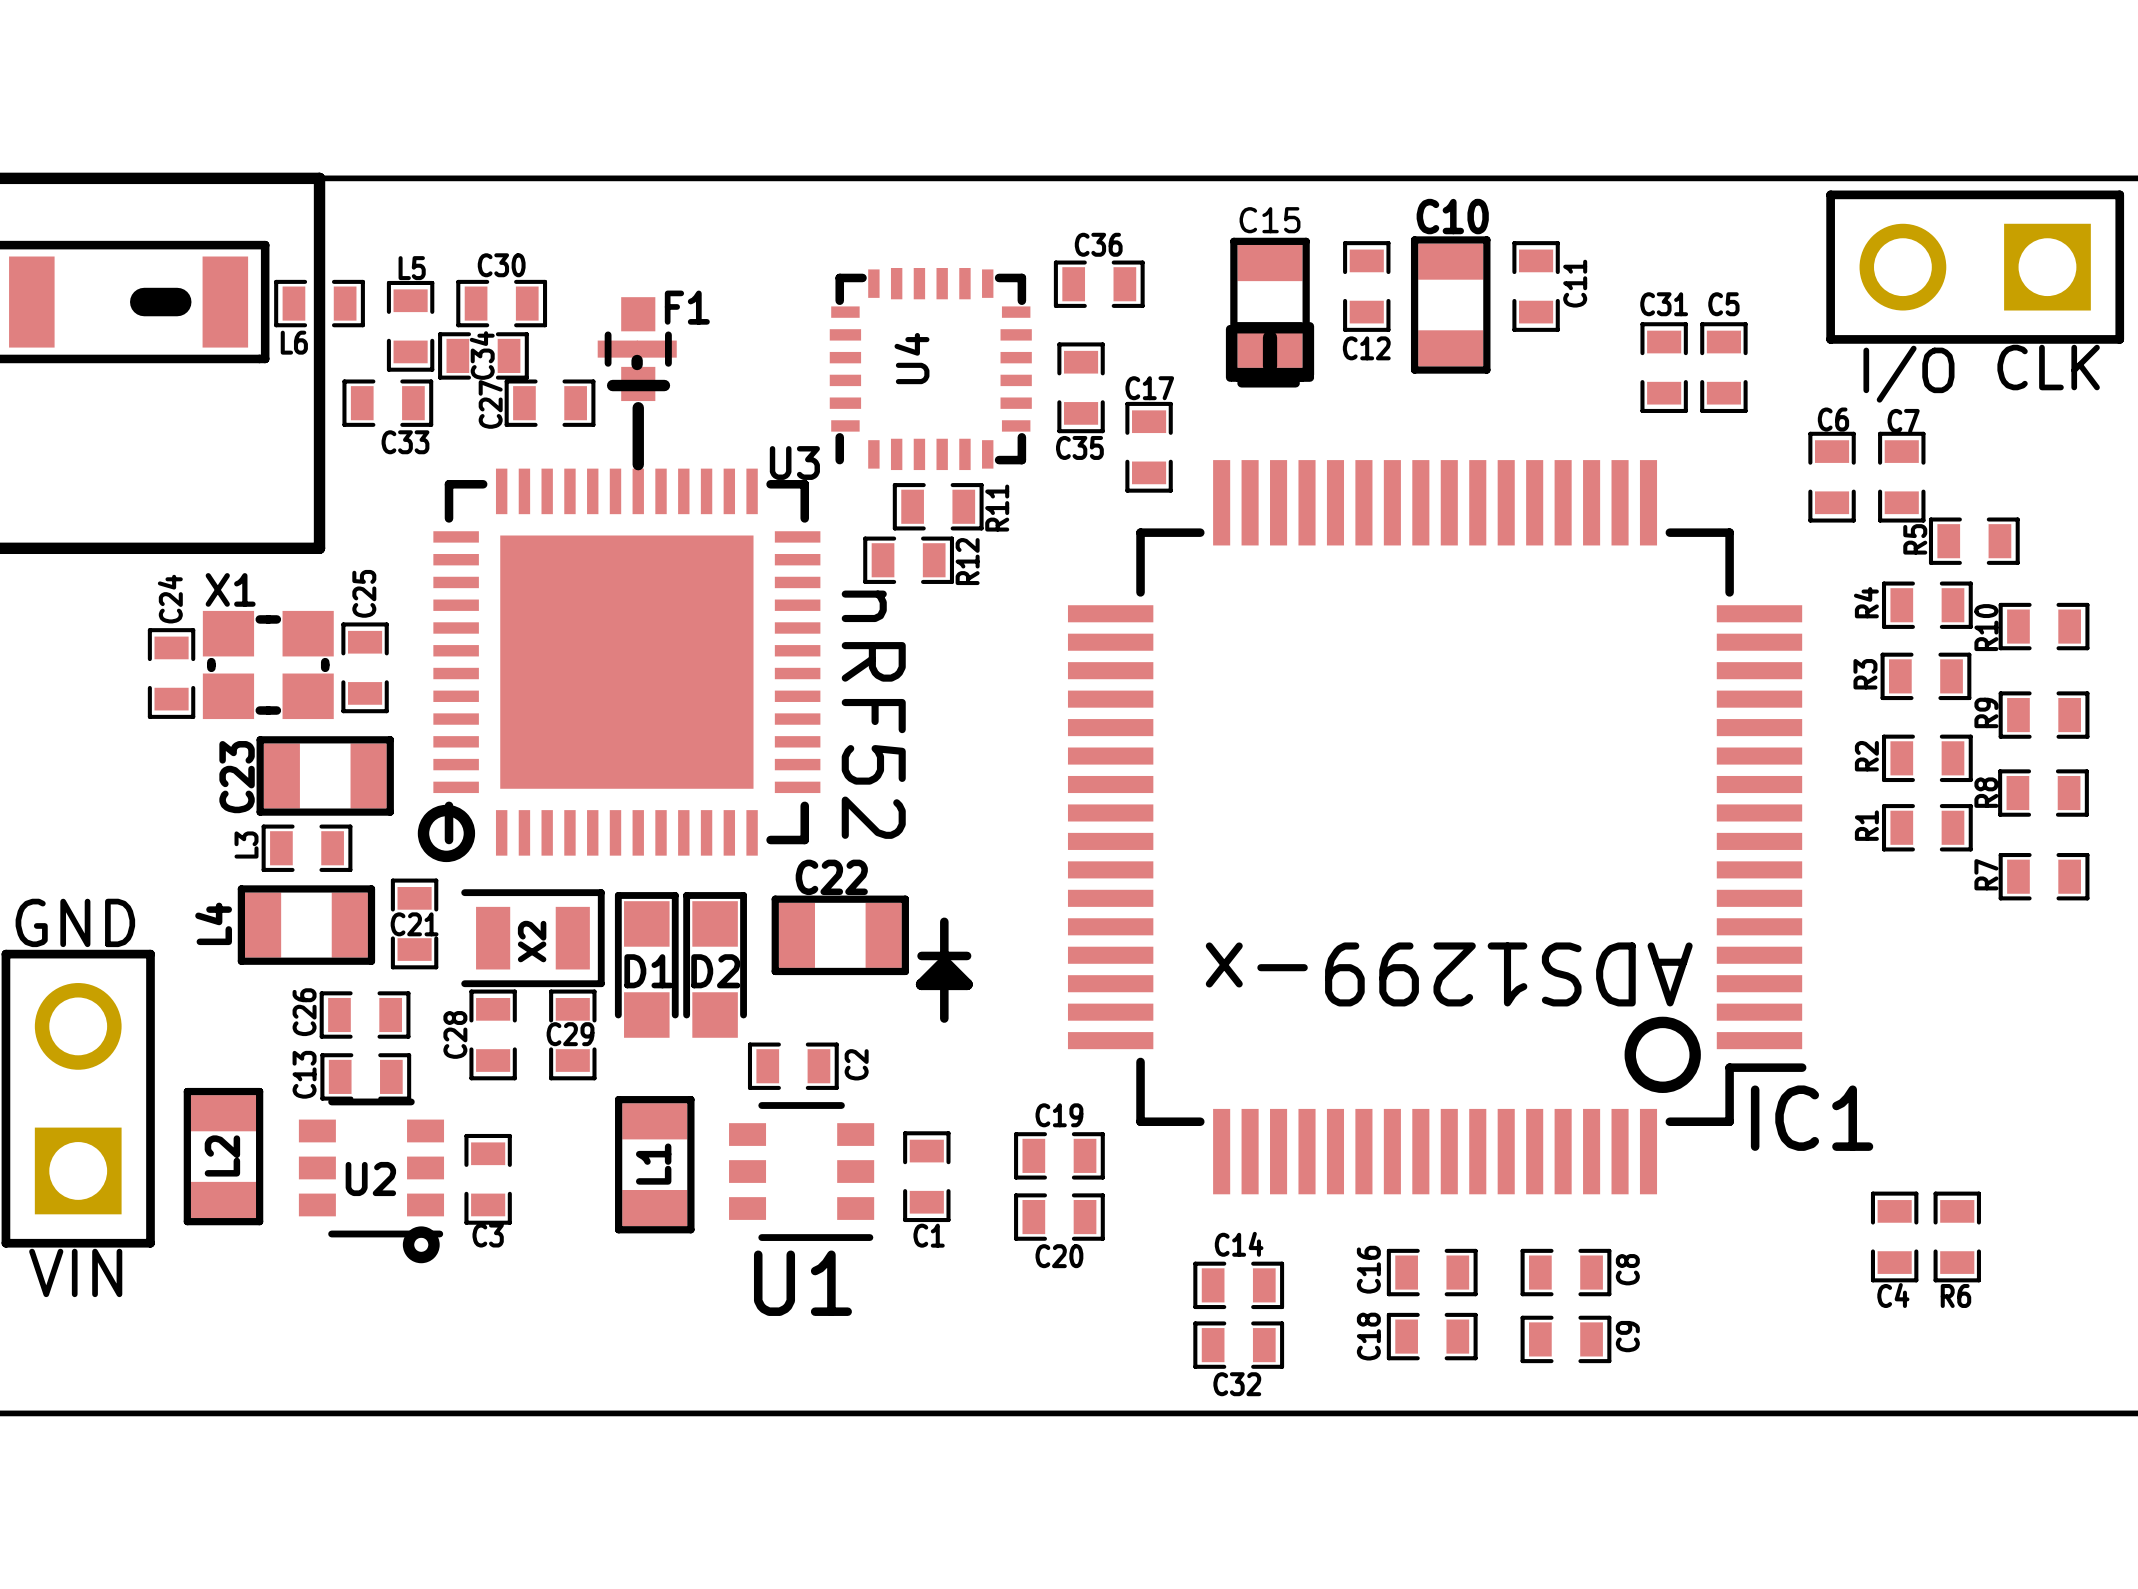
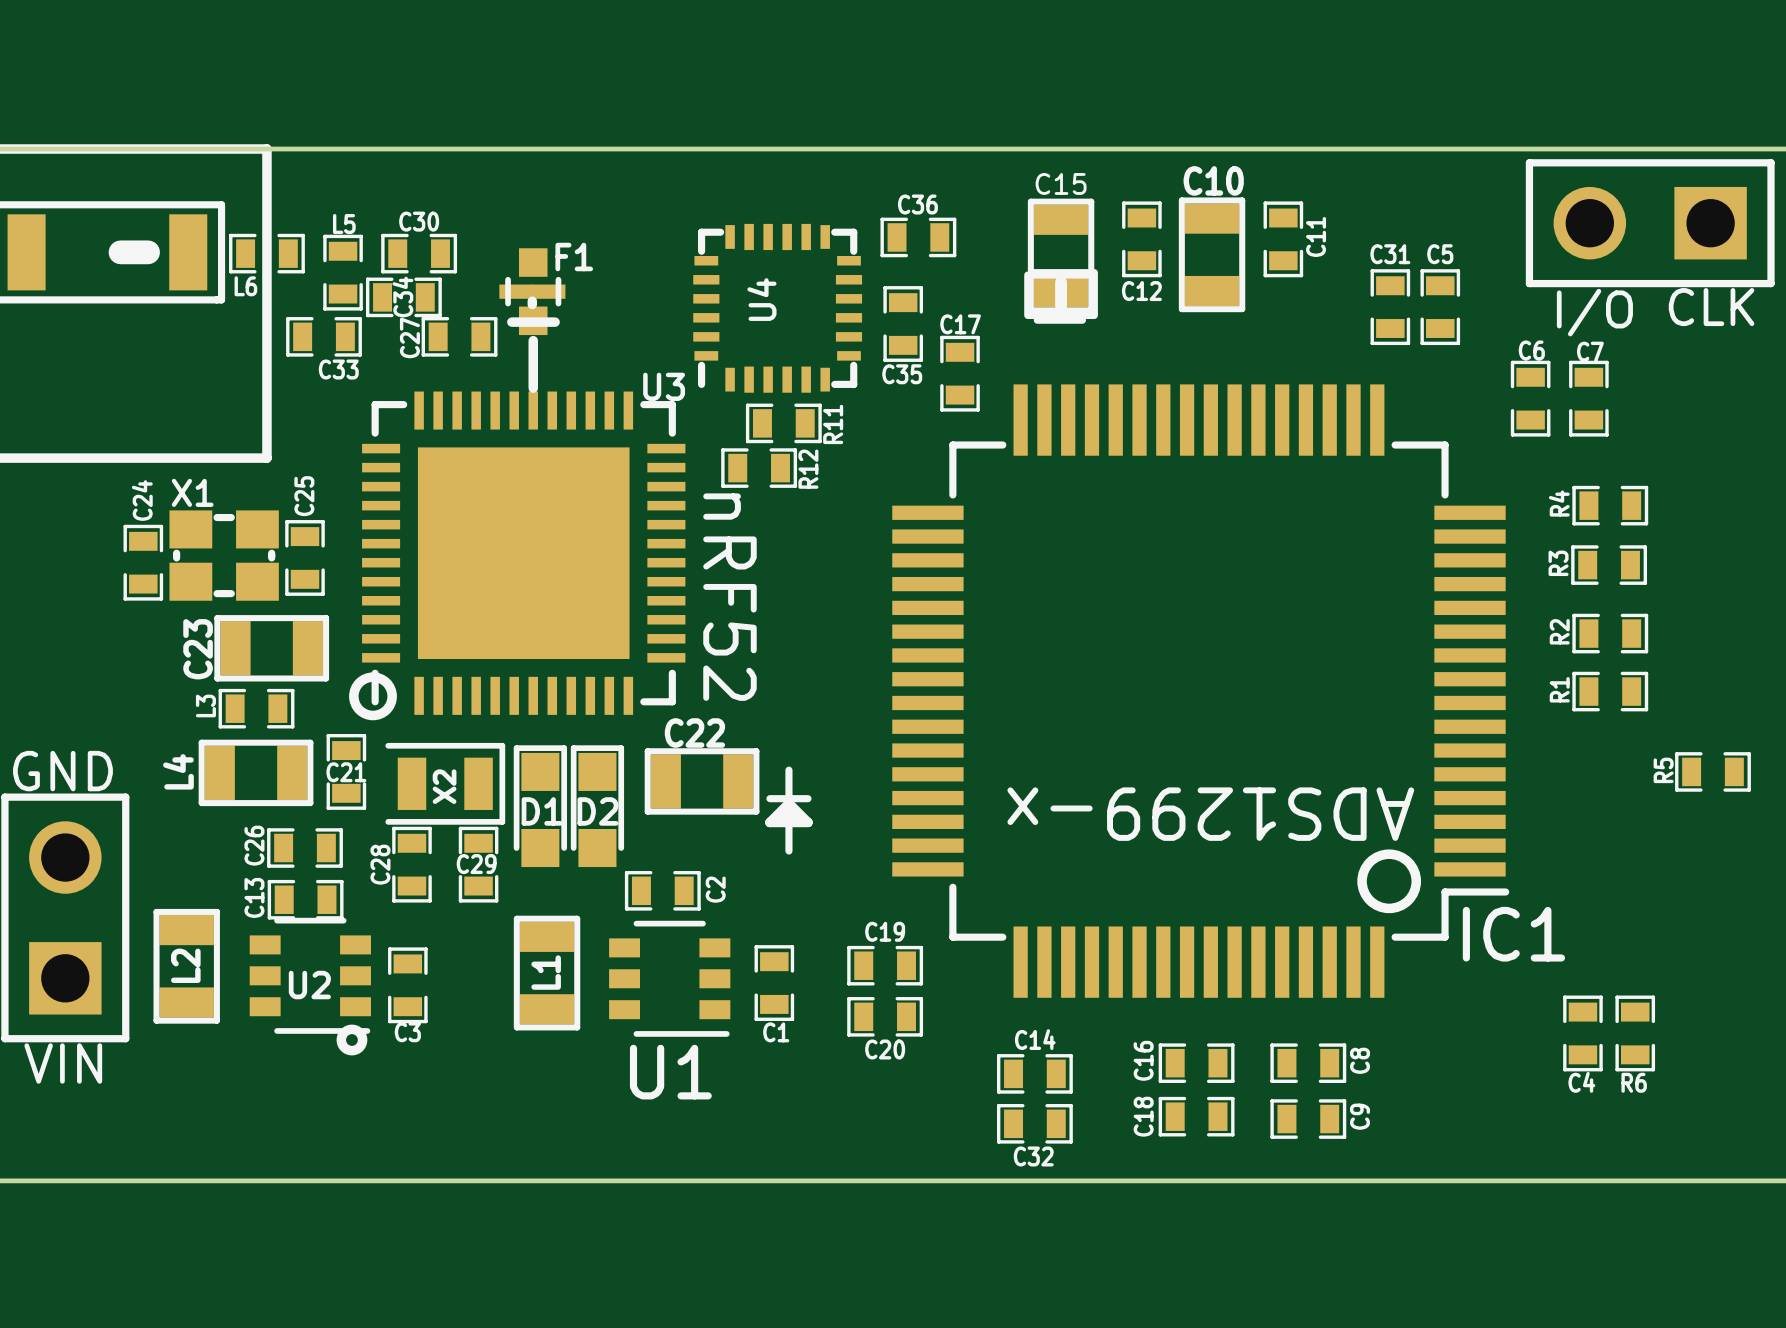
R5 position: (1974, 541) -> (1712, 771)
R10: (2044, 626) -> none
R9: (2044, 715) -> none
R8: (2043, 793) -> none
R7: (2044, 876) -> none

